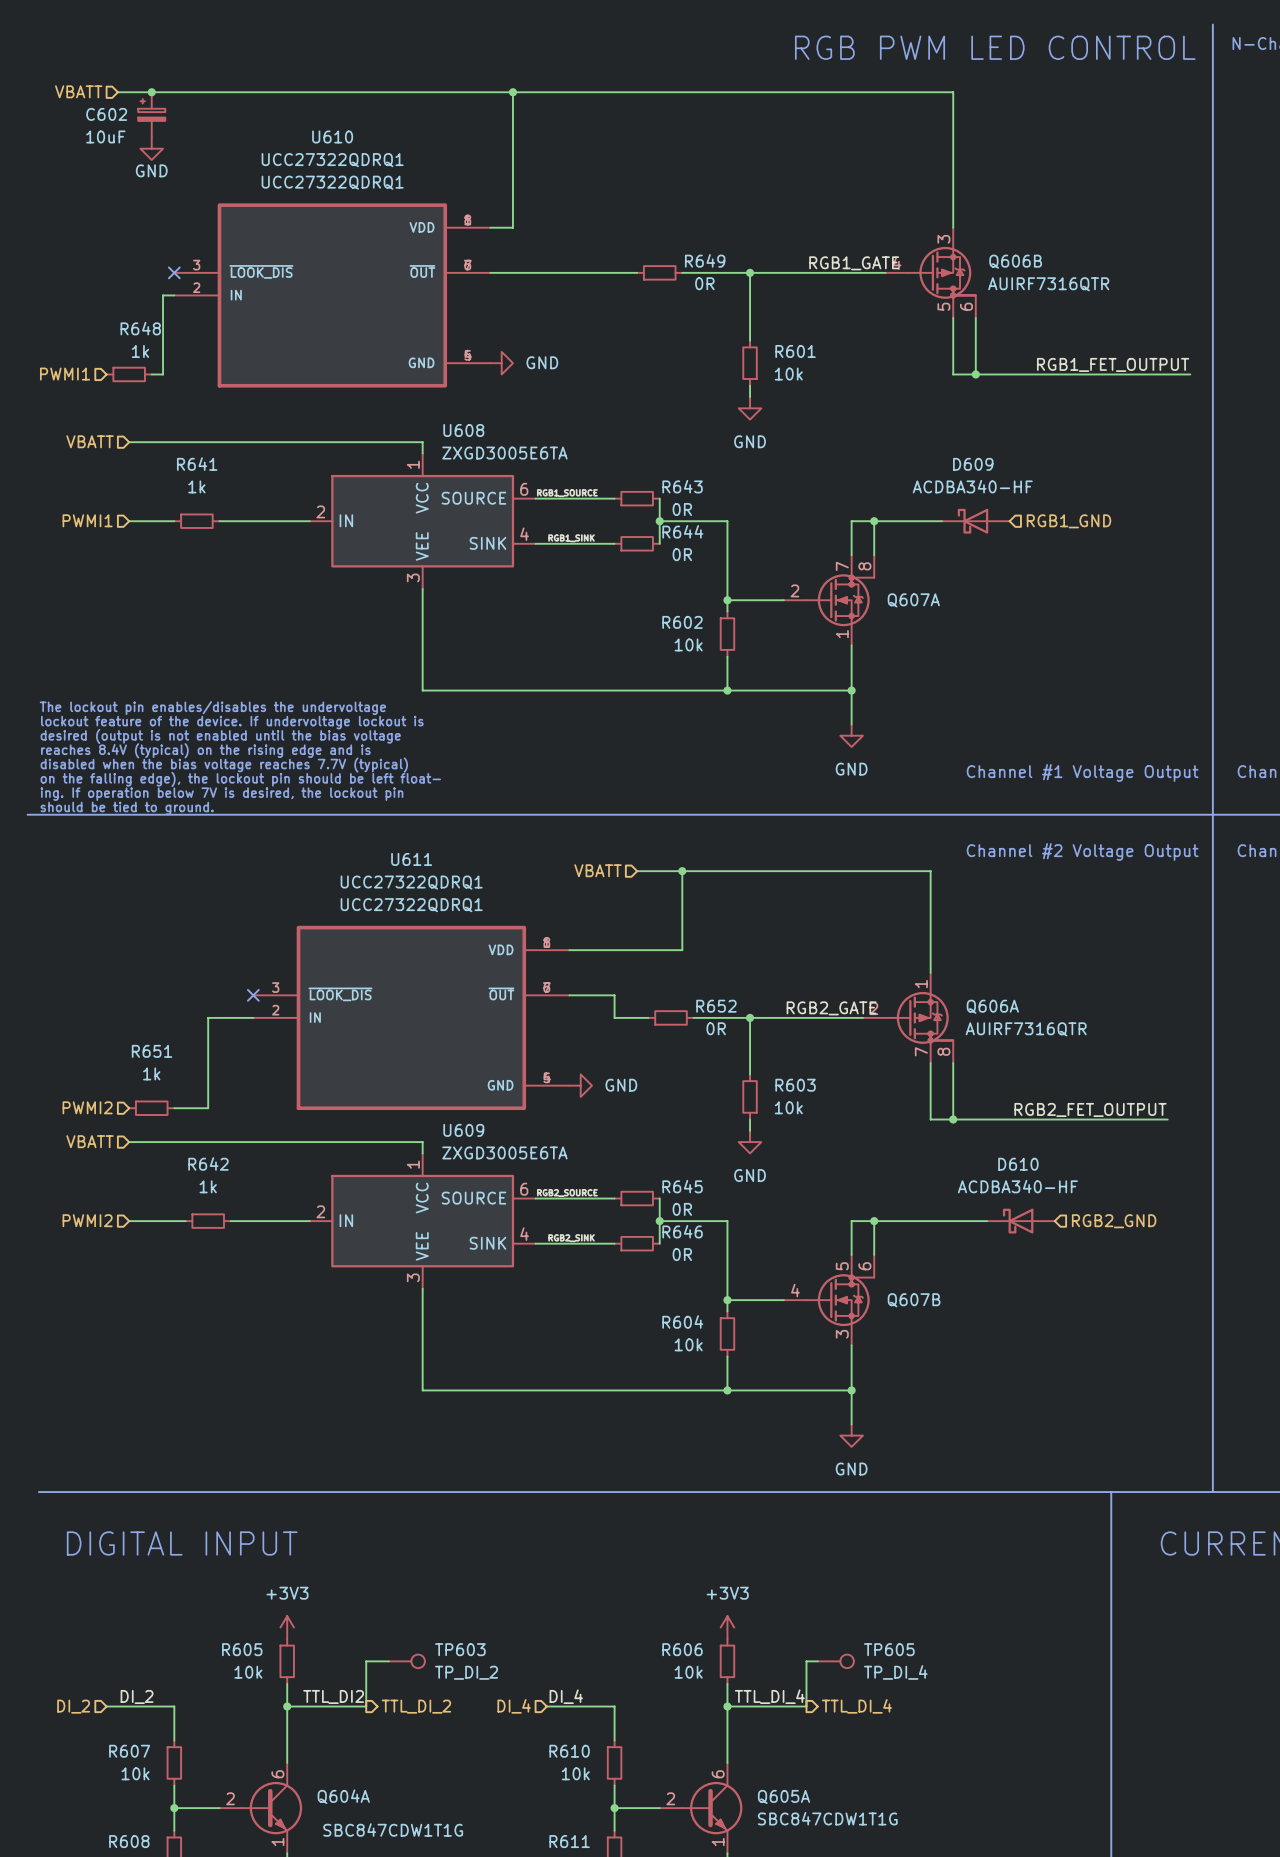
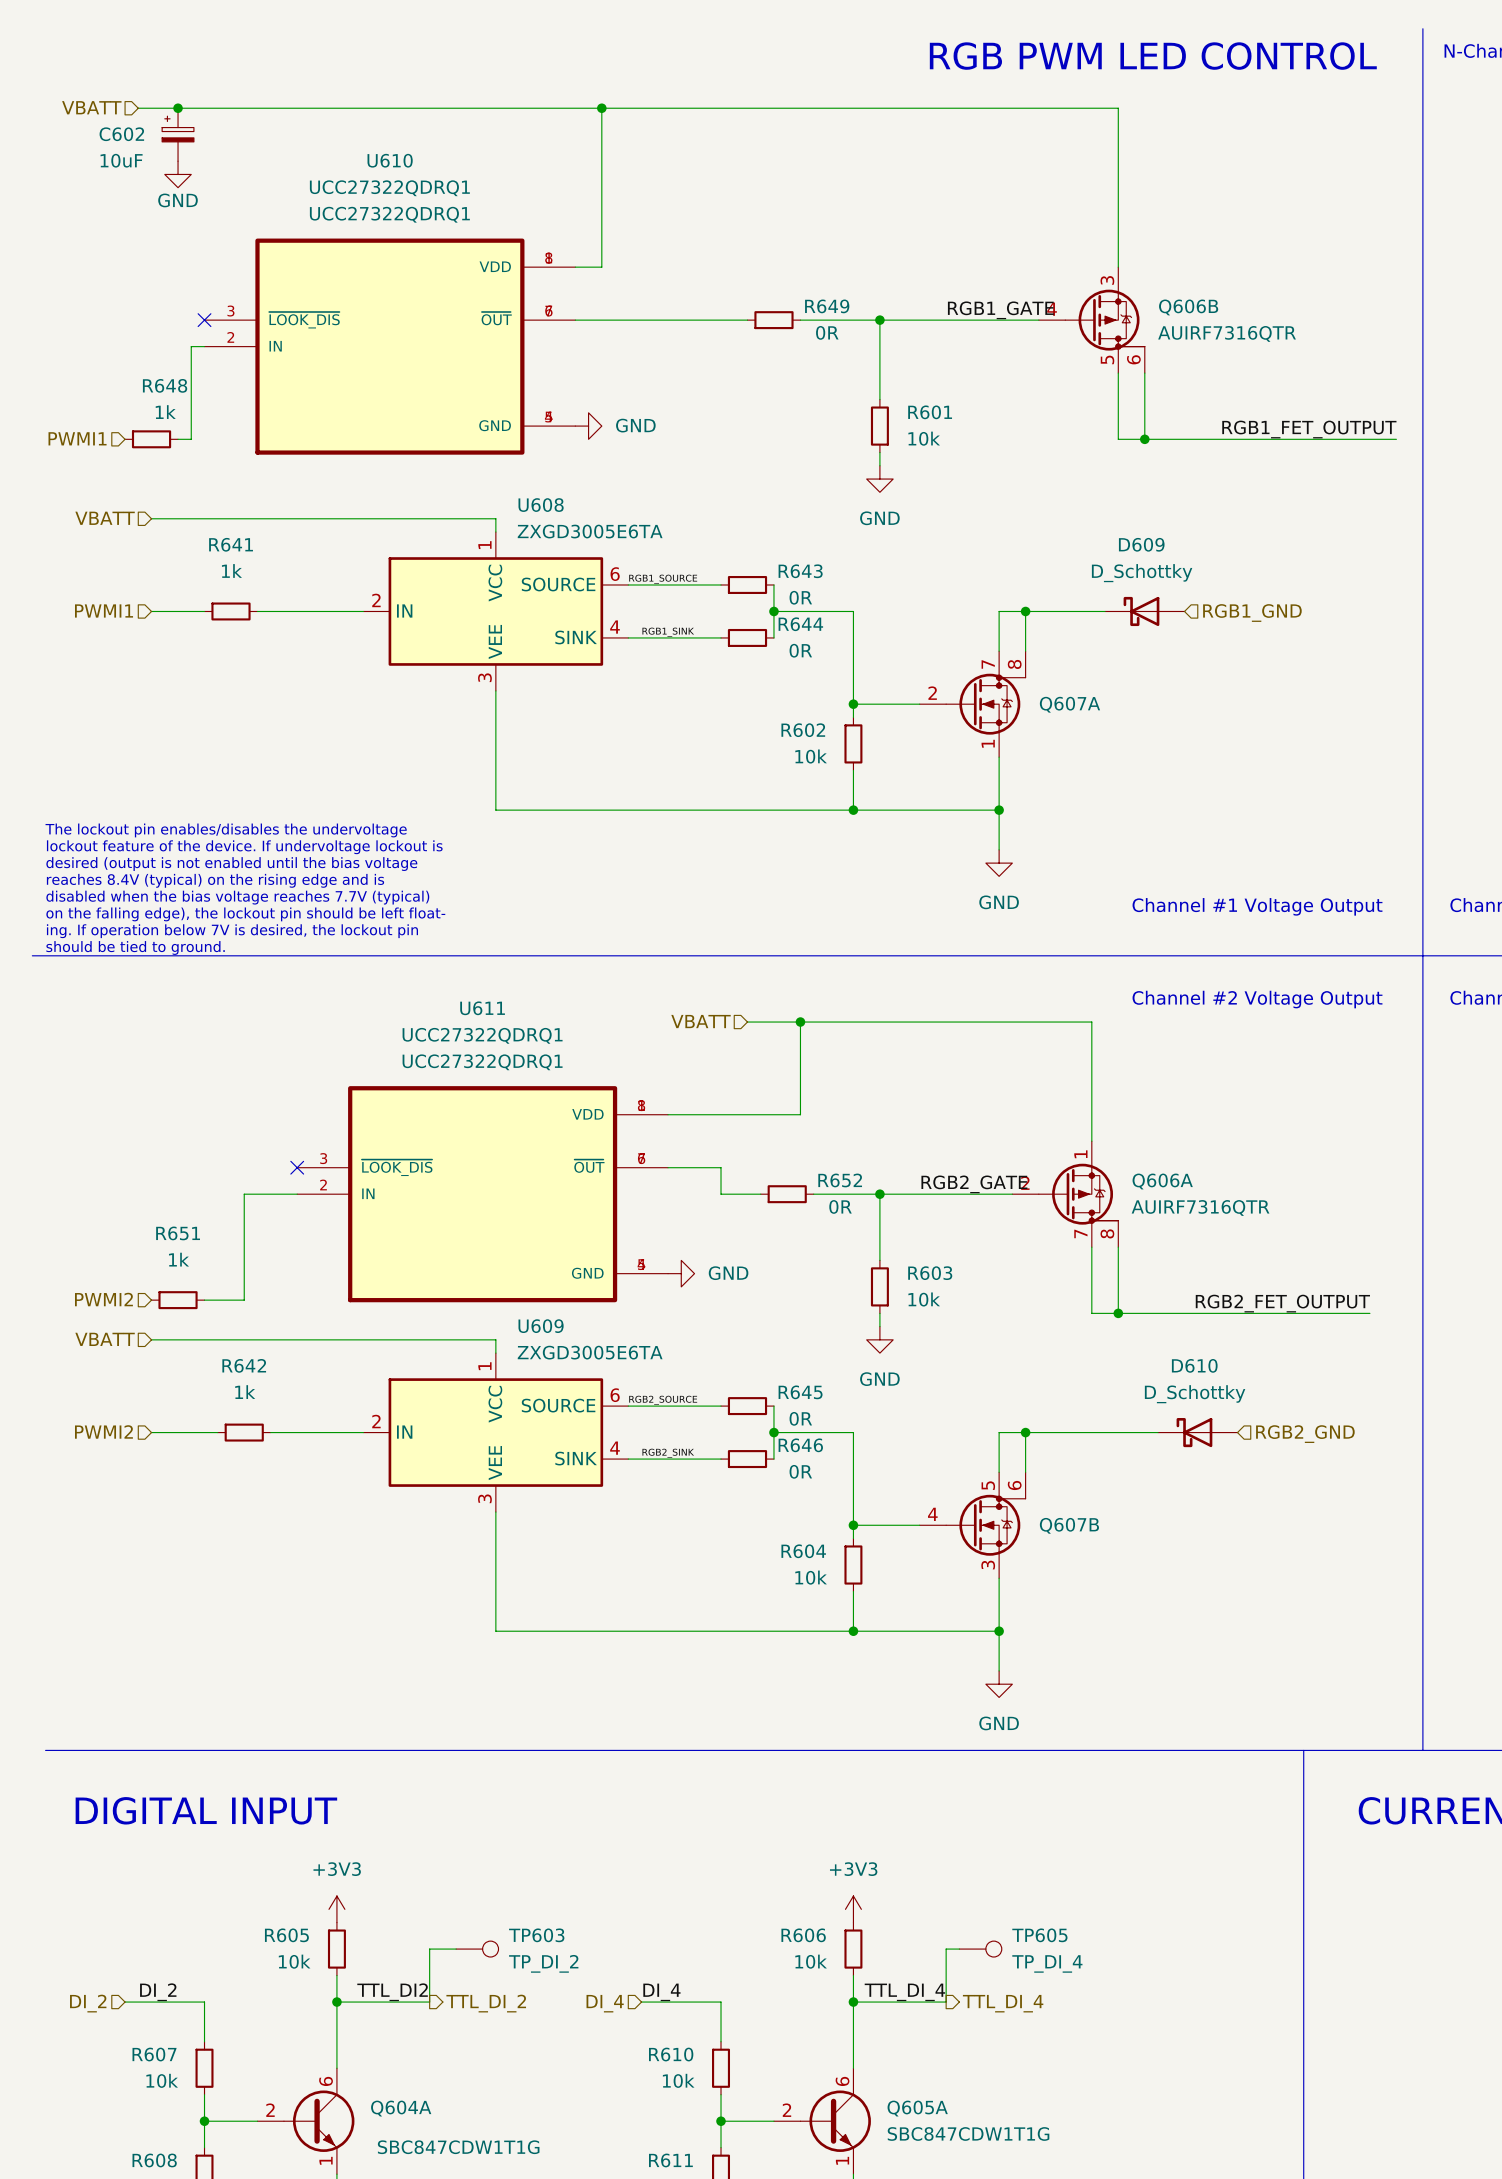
D609 value: ACDBA340-HF (972, 486) -> D_Schottky (1142, 573)
D610 value: ACDBA340-HF (1017, 1186) -> D_Schottky (1195, 1394)

